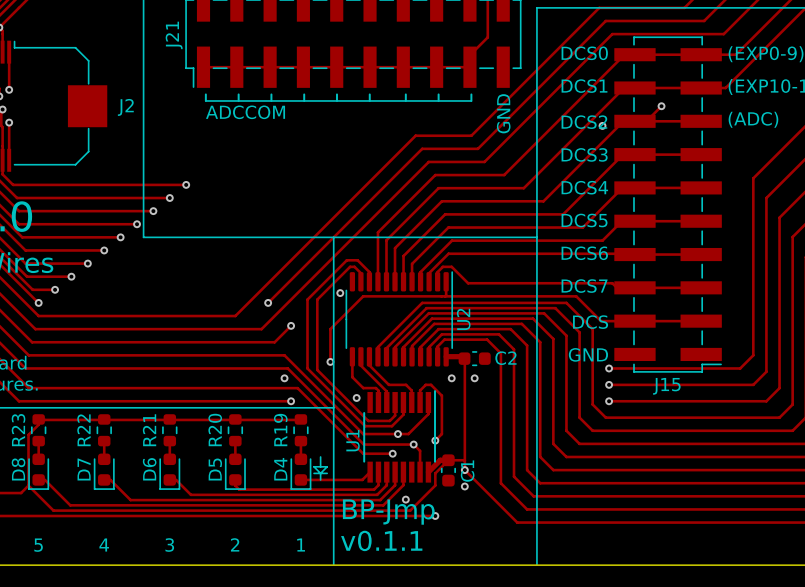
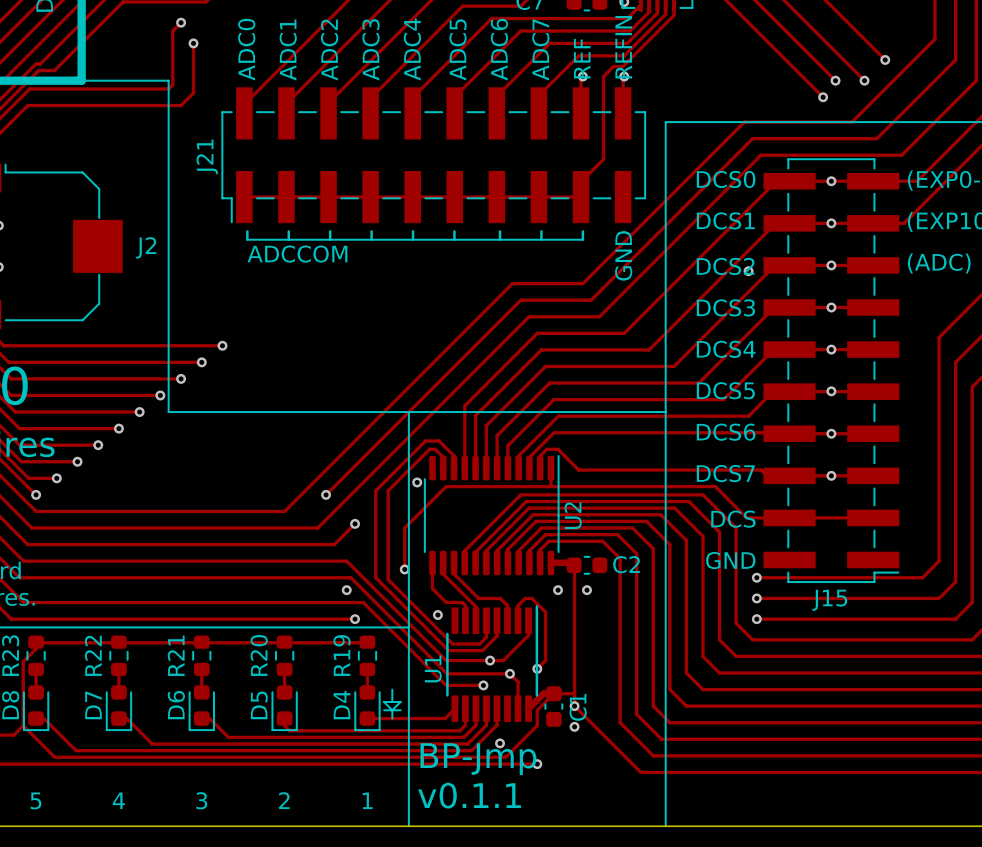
via: none -> (831, 181)
via: none -> (831, 223)
track: (661, 106) (646, 121) -> none
via: (661, 106) -> none
via: none -> (831, 265)
via: none -> (831, 307)
via: none -> (831, 349)
via: none -> (831, 391)
via: none -> (831, 433)
via: none -> (831, 475)

